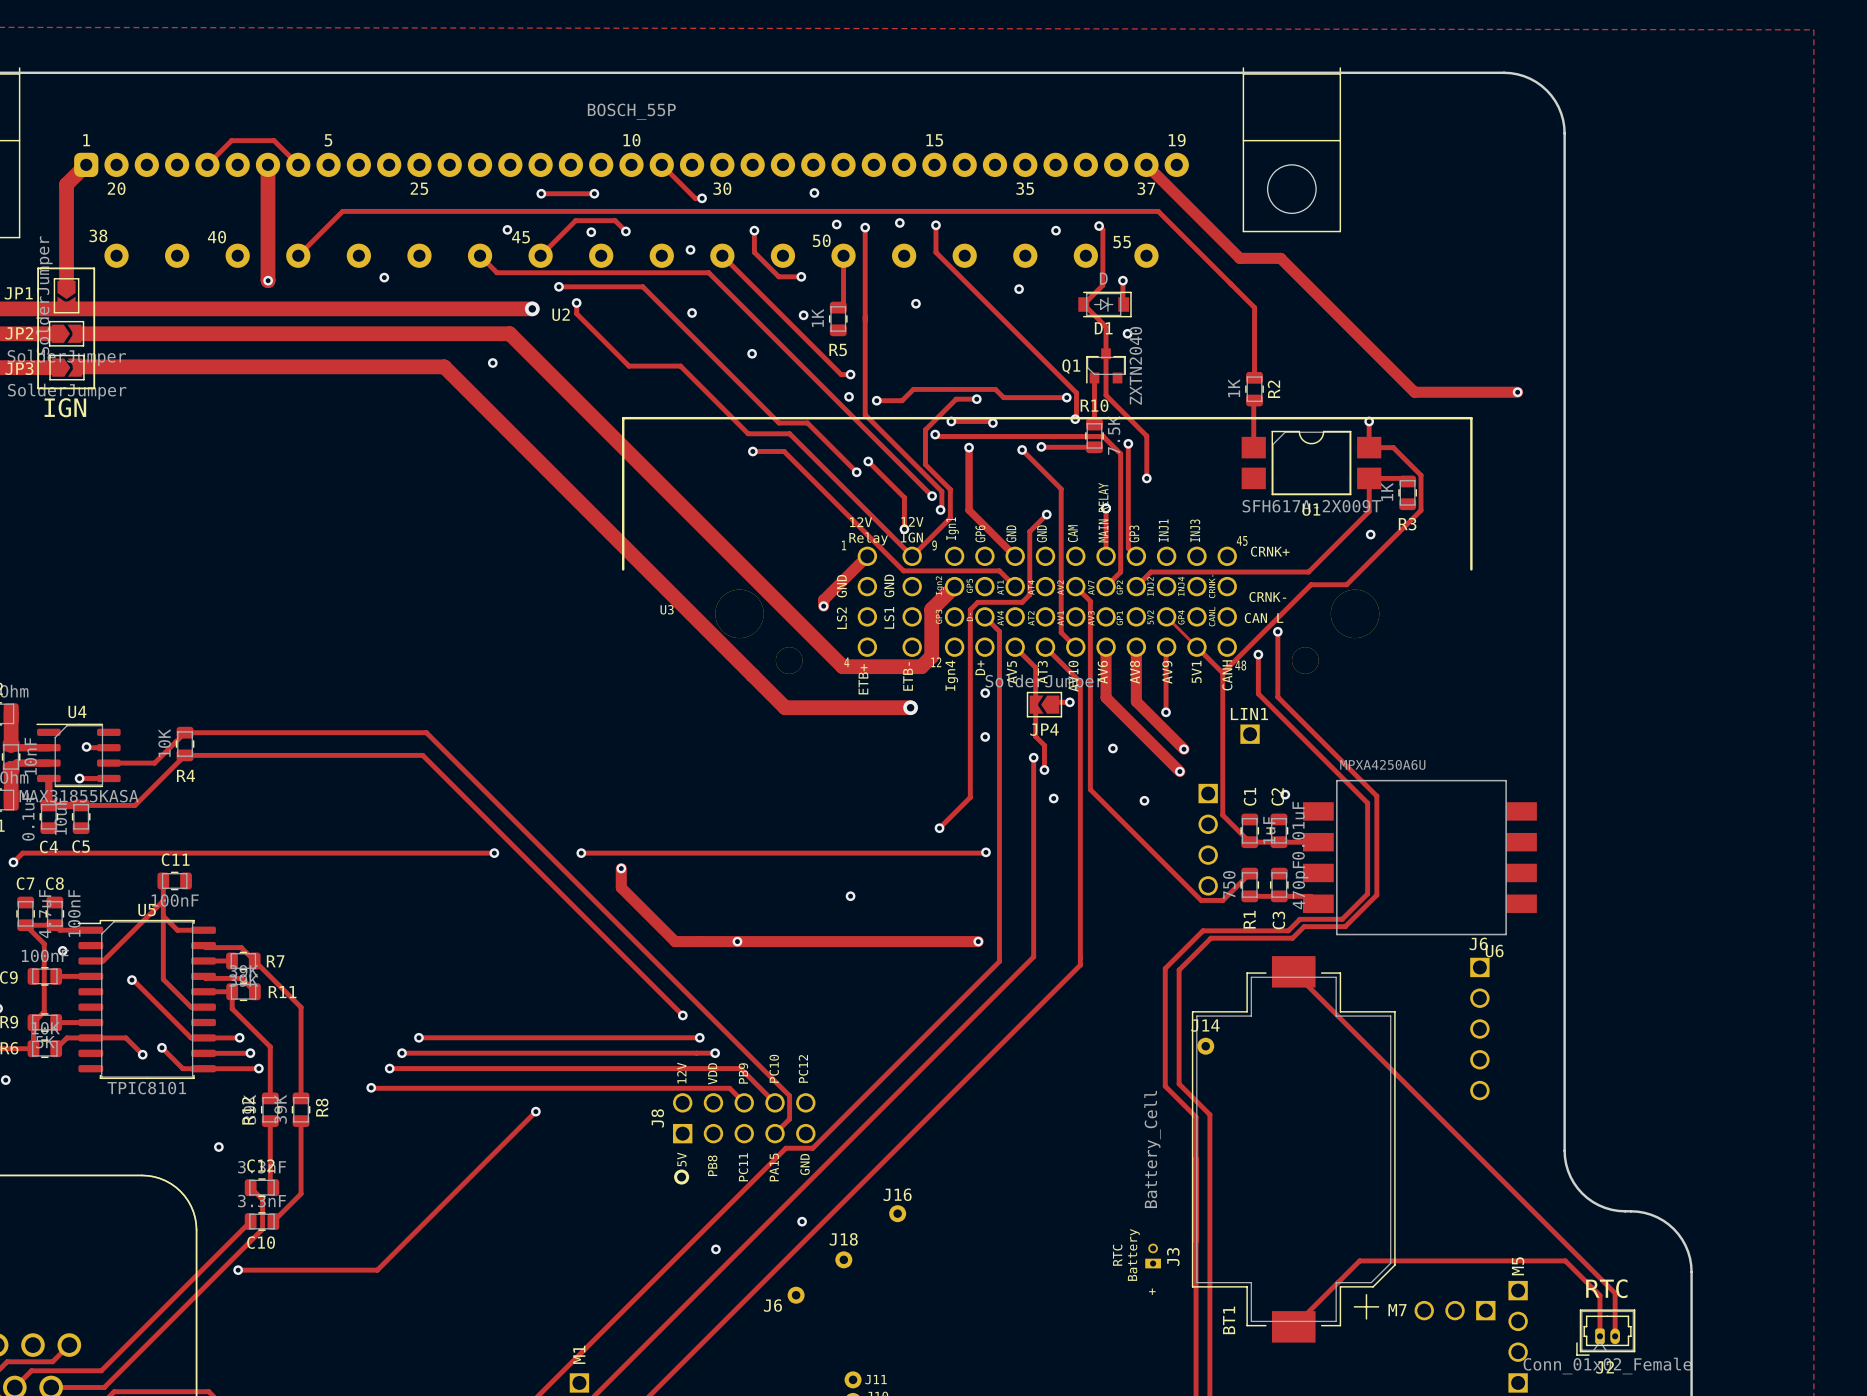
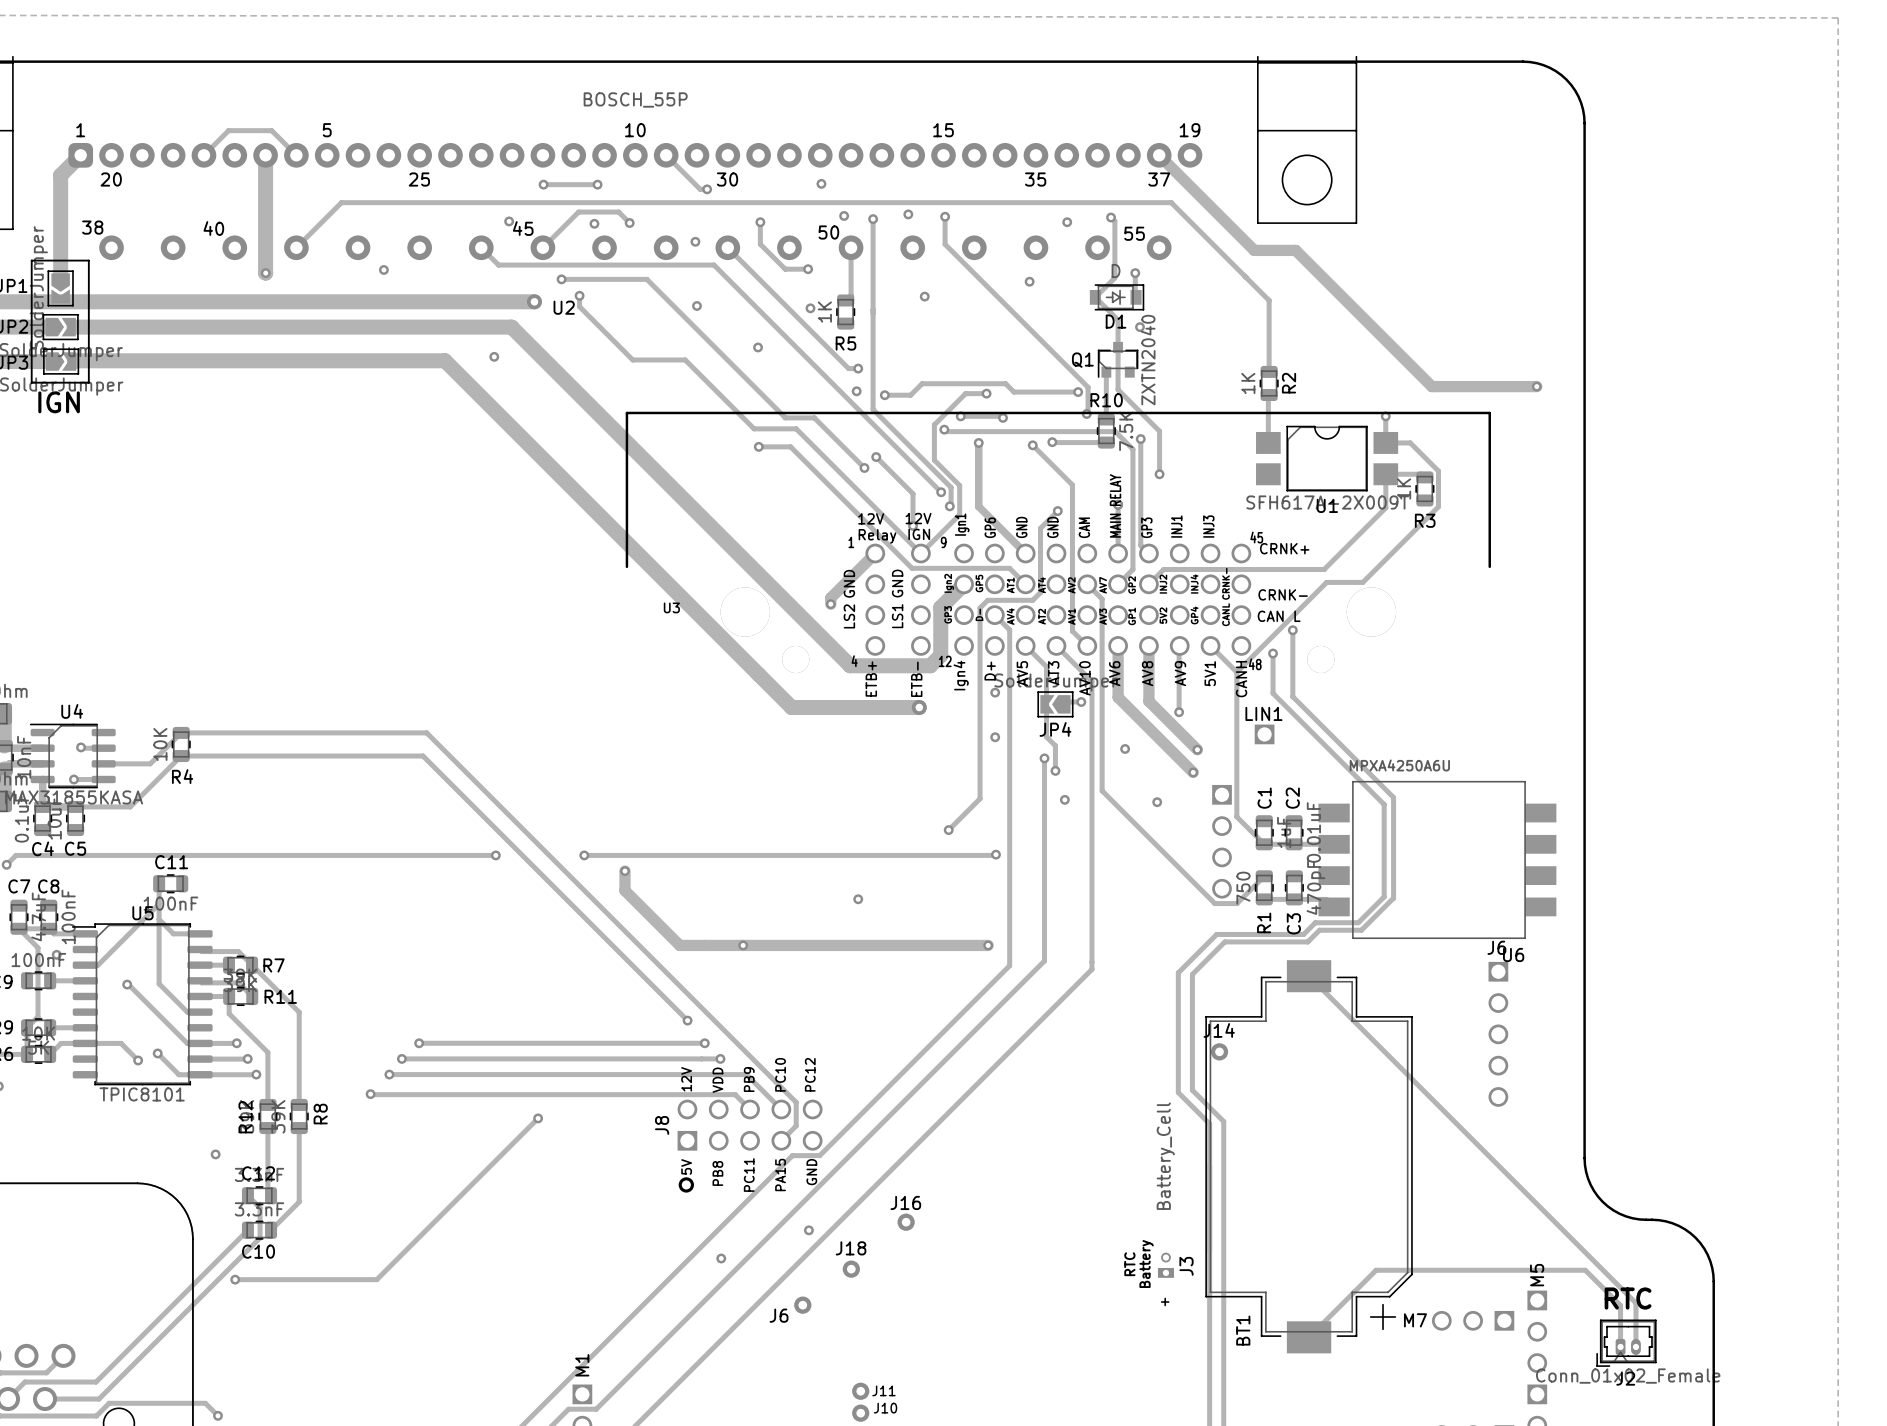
via: (1370, 534) -> none
track: (1166, 616) (1196, 647) -> none
via: (1285, 794) -> none

